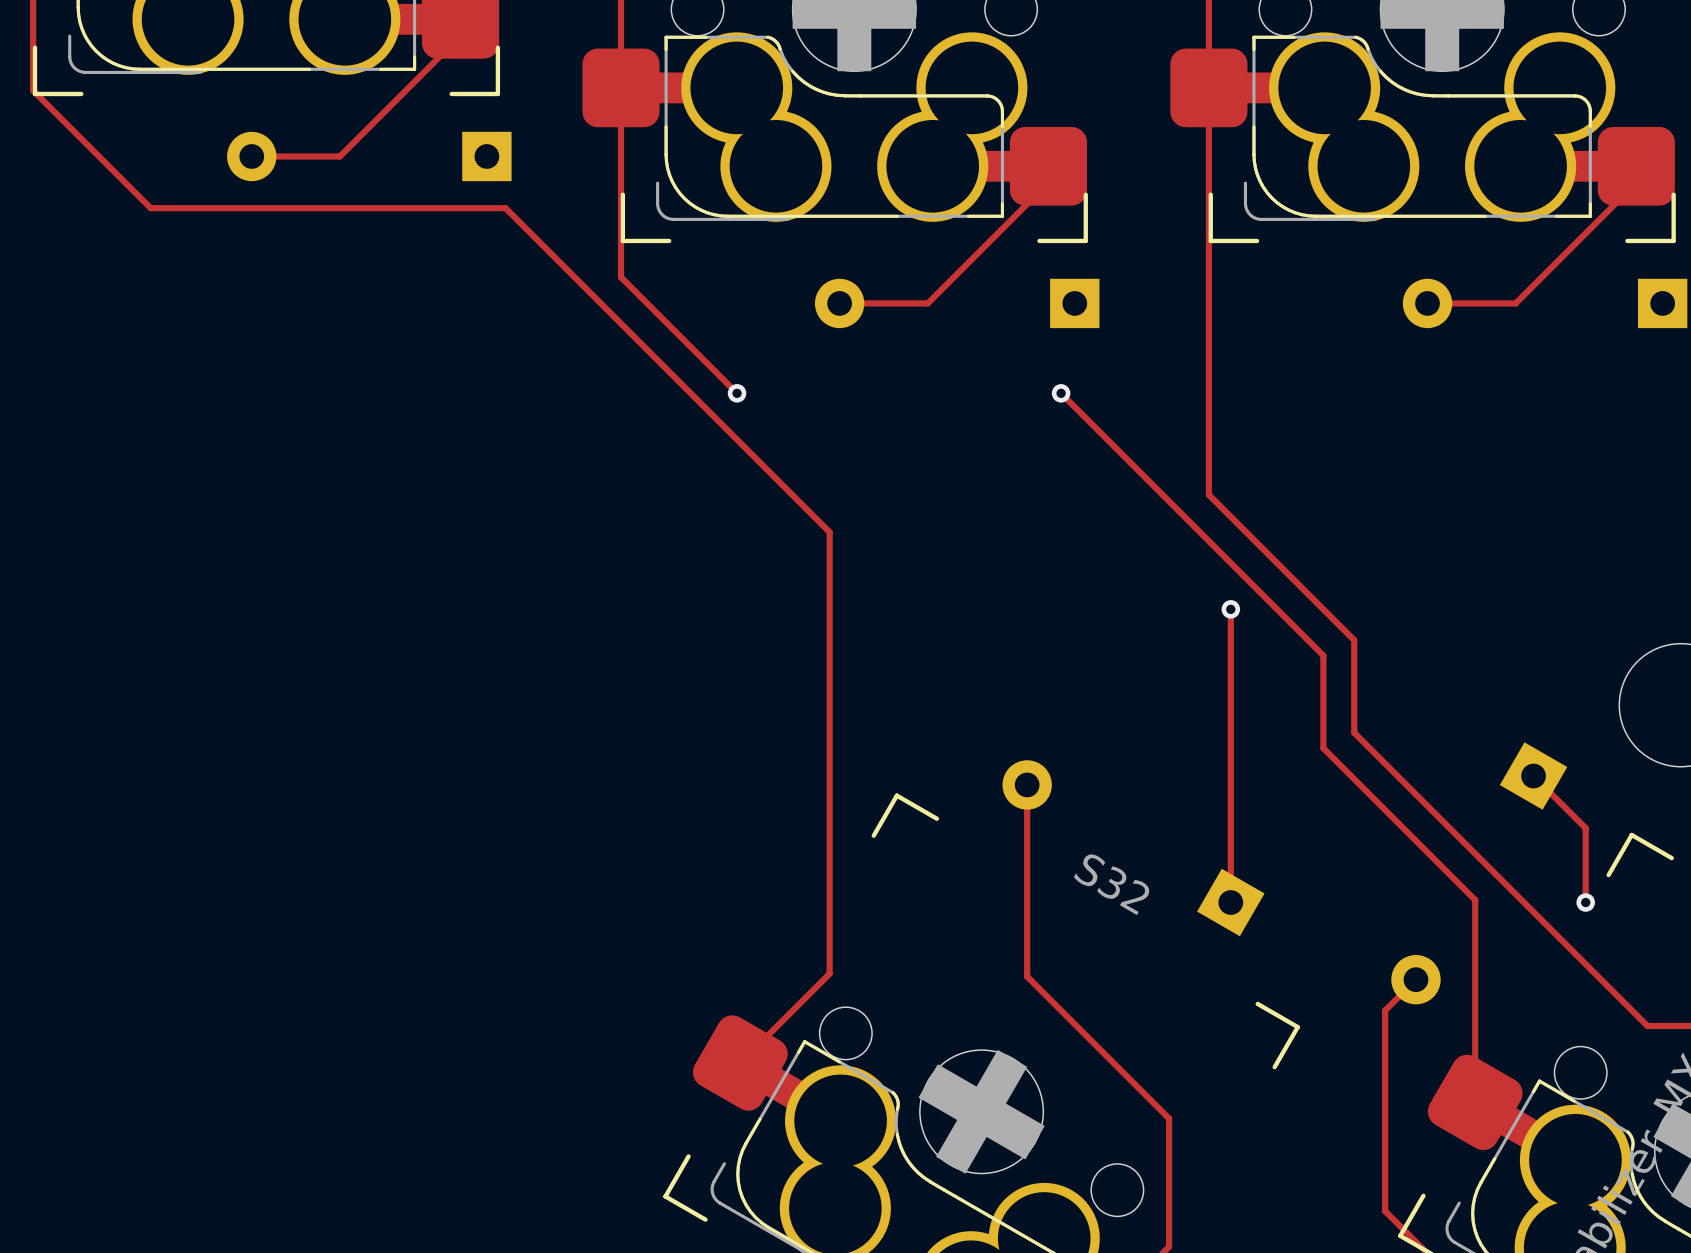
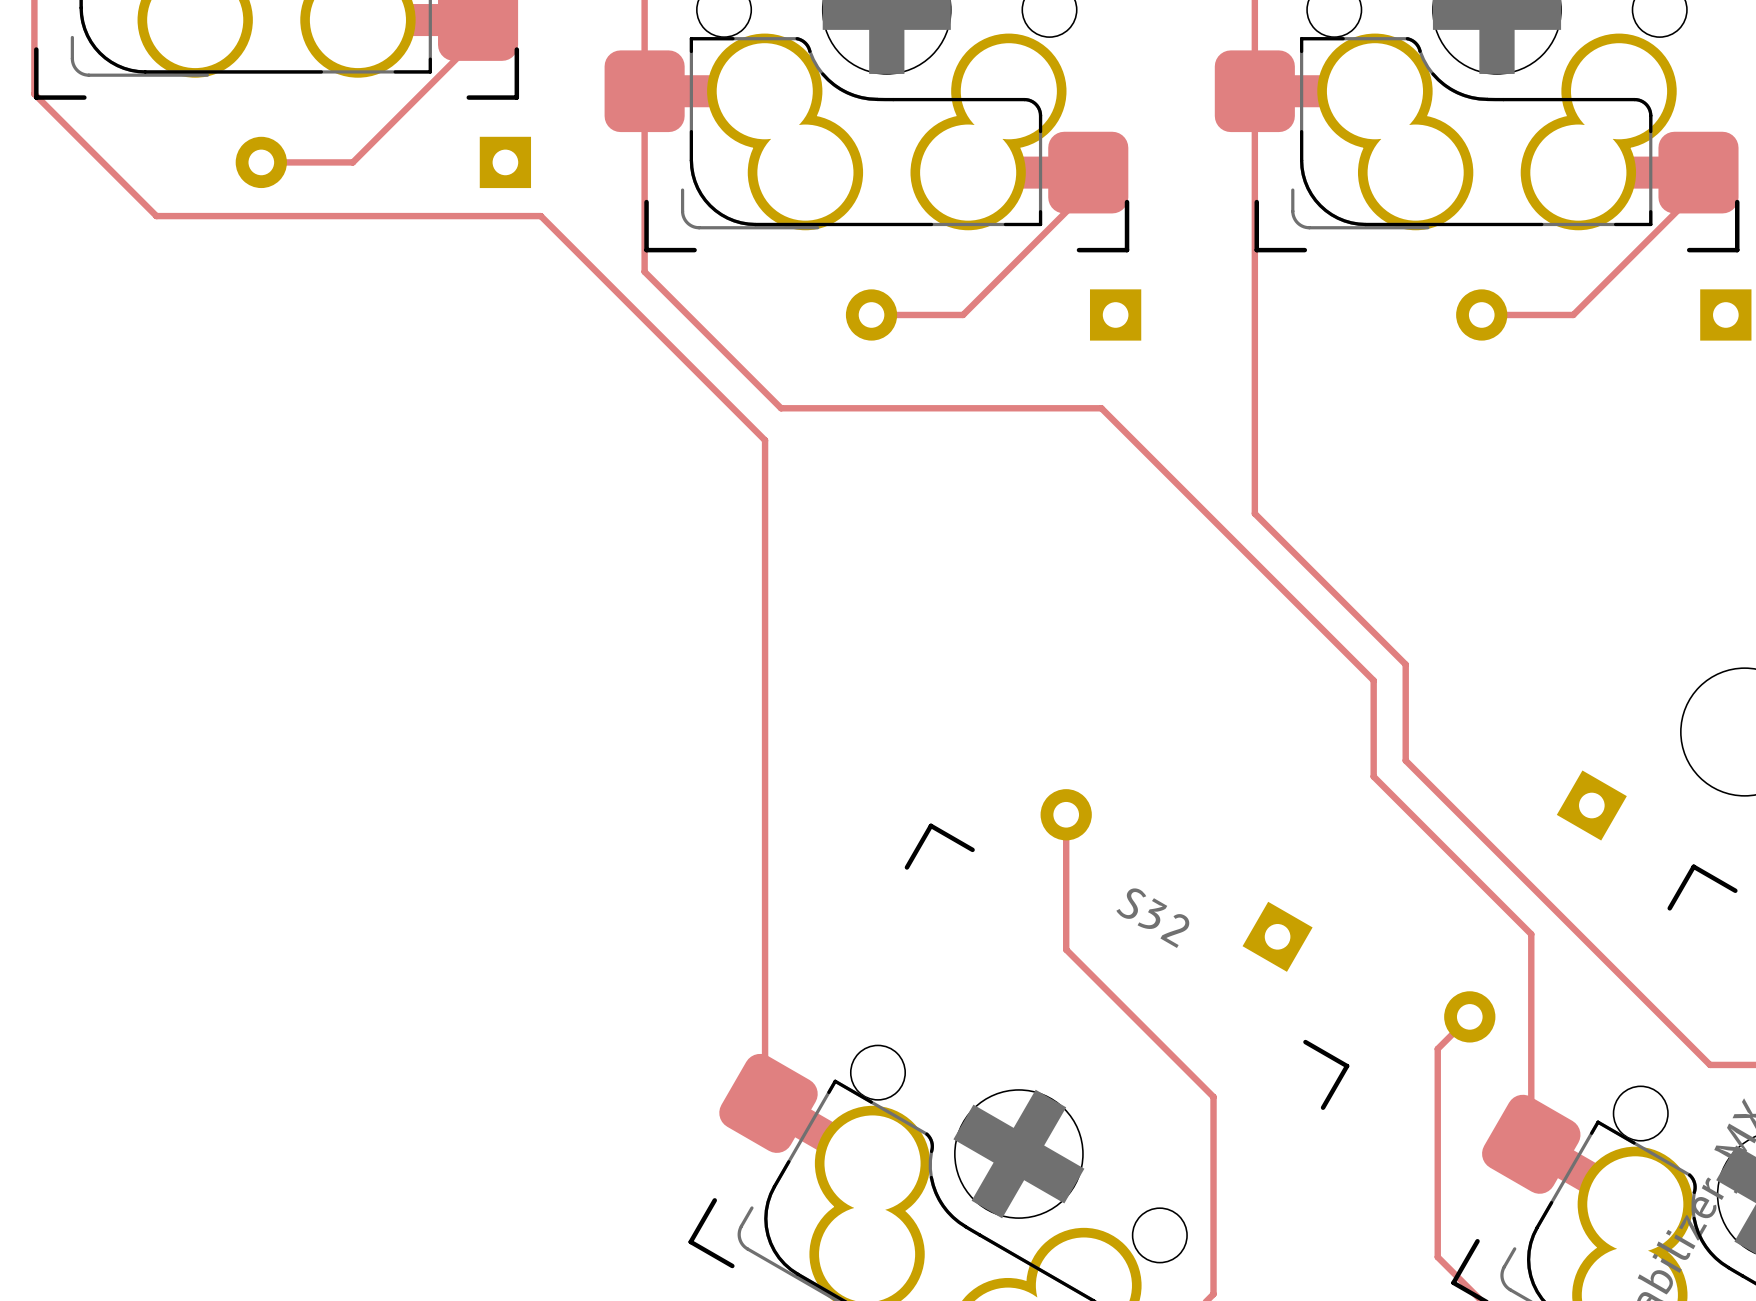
track: (505, 208) (829, 532) (829, 973) (740, 1063) -> (524, 216) (540, 216) (765, 440) (765, 1099) (768, 1103)
track: (621, 261) (621, 277) (737, 393) -> (644, 271) (781, 408) (1101, 408)
via: (737, 393) -> none
via: (1061, 393) -> none
track: (1230, 609) (1230, 902) -> none
via: (1230, 609) -> none
track: (1533, 776) (1585, 828) (1585, 902) -> none
via: (1585, 902) -> none
track: (1027, 914) (1027, 976) (1169, 1118) -> (1066, 949) (1213, 1096) (1213, 1161)

